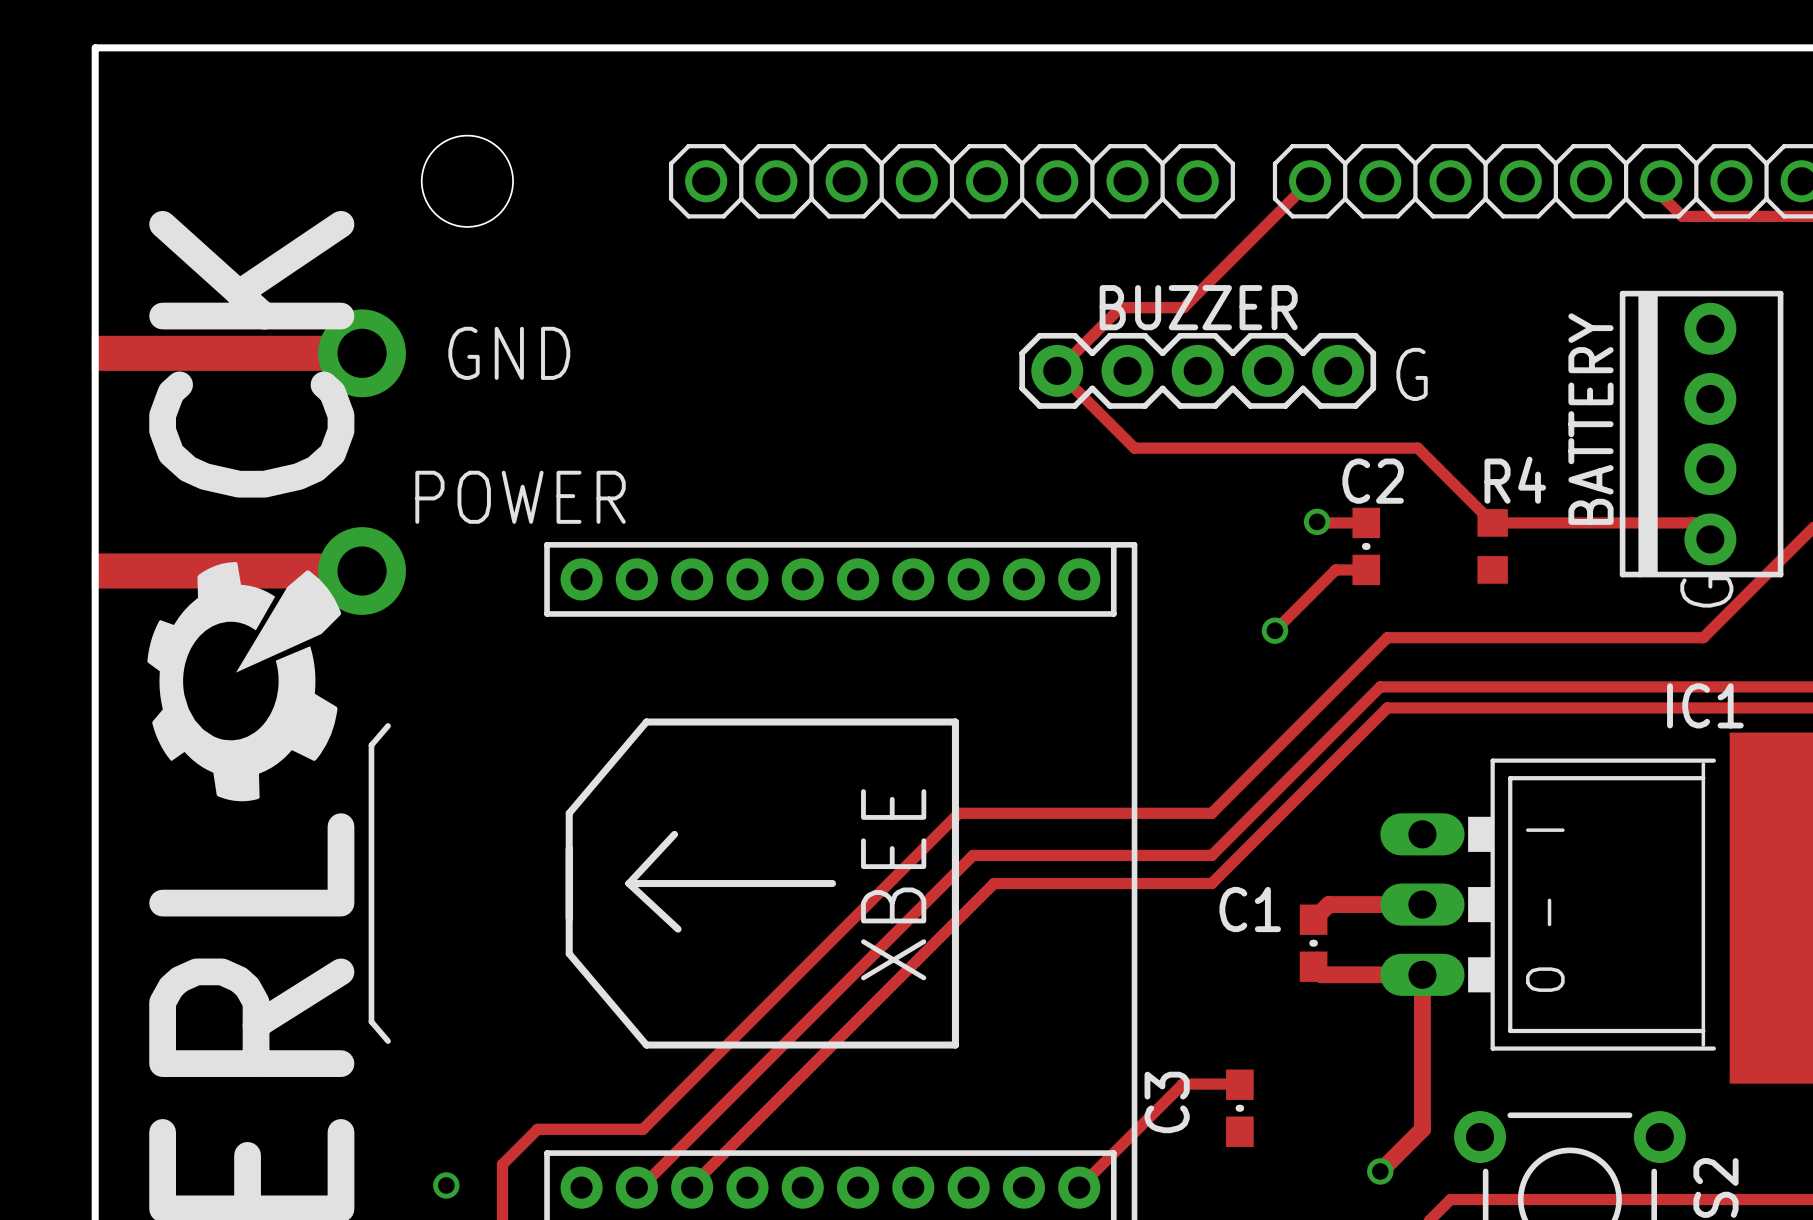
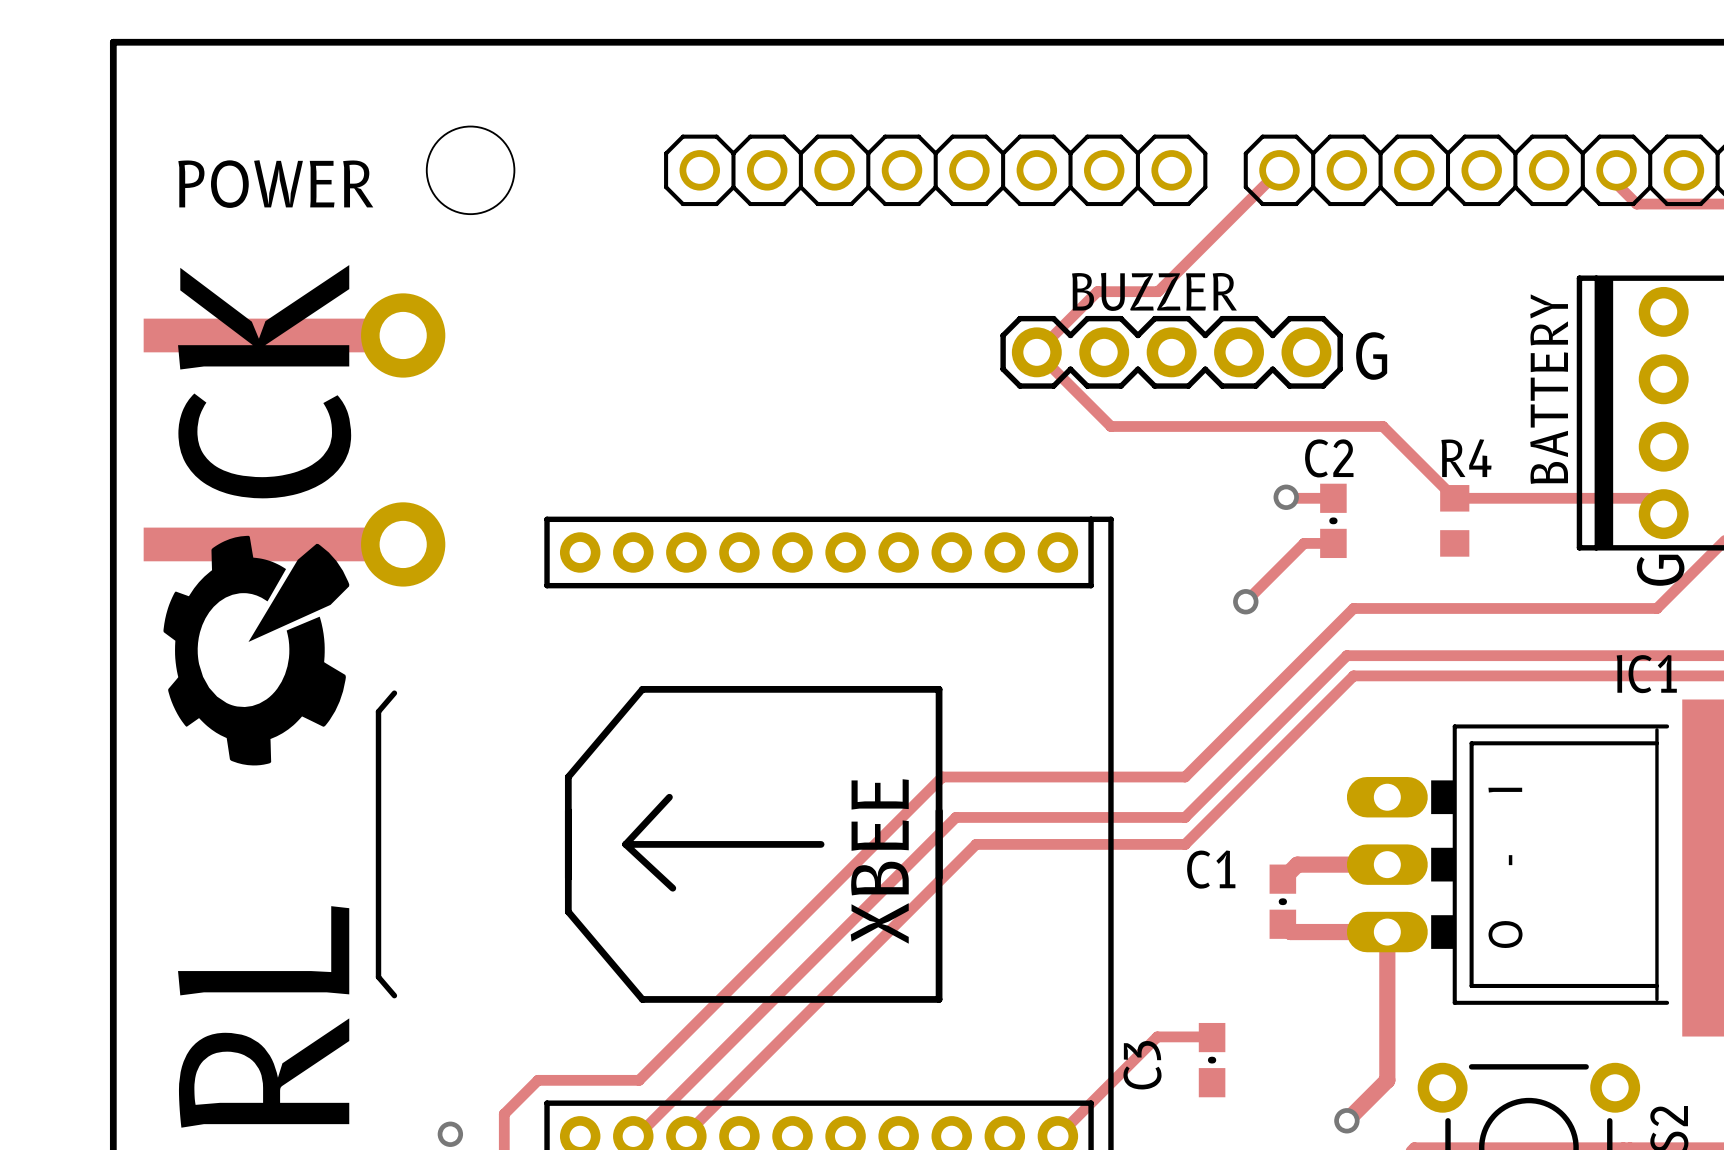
text: GND (509, 353) -> none
POWER position: (248, 462) -> (294, 439)
POWER name position: POWER (520, 497) -> POWER (275, 184)

